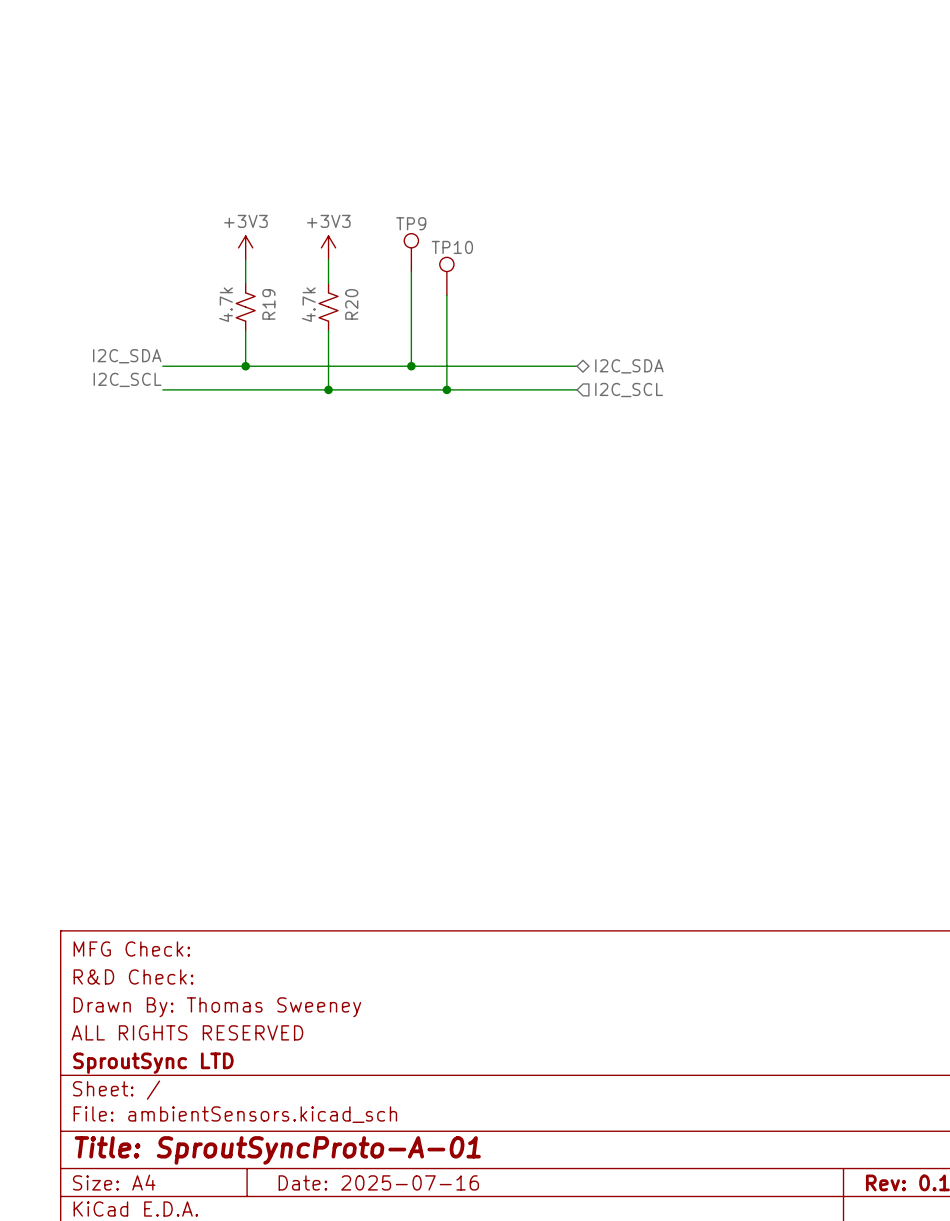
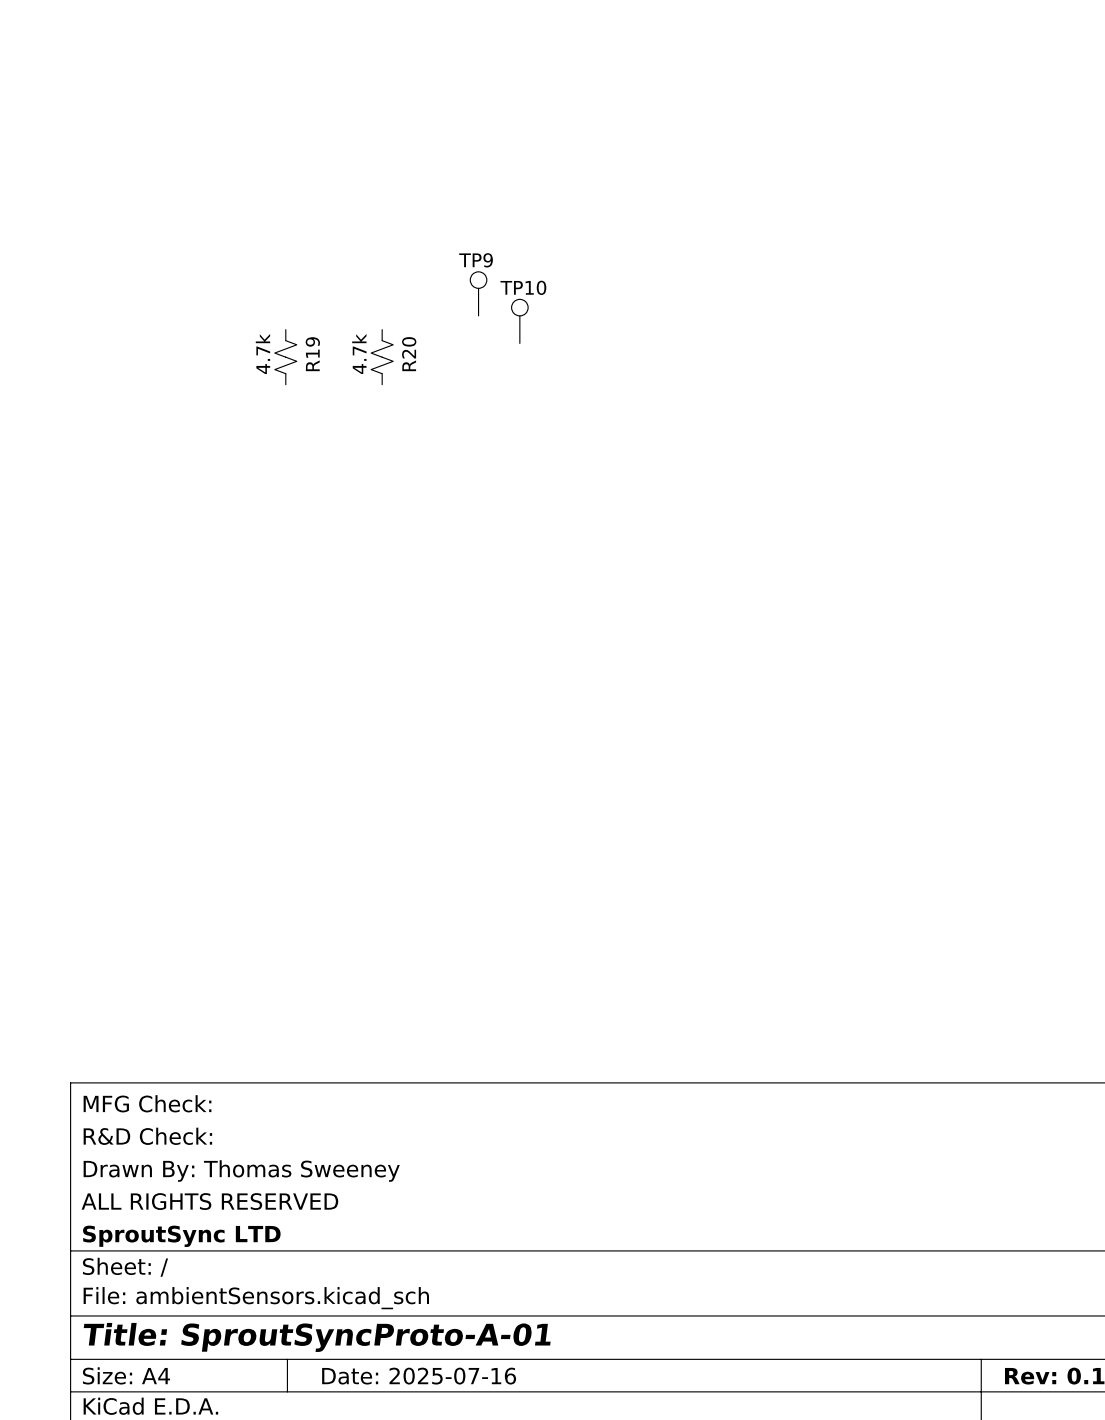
power symbol: +3V3 (245, 247) -> none
power symbol: +3V3 (328, 247) -> none
wire: (245, 259) (245, 283) -> none
wire: (328, 259) (328, 283) -> none
wire: (411, 271) (411, 366) -> none
wire: (446, 295) (446, 389) -> none
wire: (245, 330) (245, 366) -> none
wire: (328, 330) (328, 389) -> none
label: I2C_SDA (127, 356) -> none
wire: (162, 366) (577, 366) -> none
junction: (245, 366) -> none
junction: (411, 366) -> none
hierarchical label: I2C_SDA (629, 366) -> none
label: I2C_SCL (127, 379) -> none
wire: (162, 389) (577, 389) -> none
junction: (328, 389) -> none
junction: (446, 389) -> none
hierarchical label: I2C_SCL (629, 390) -> none

